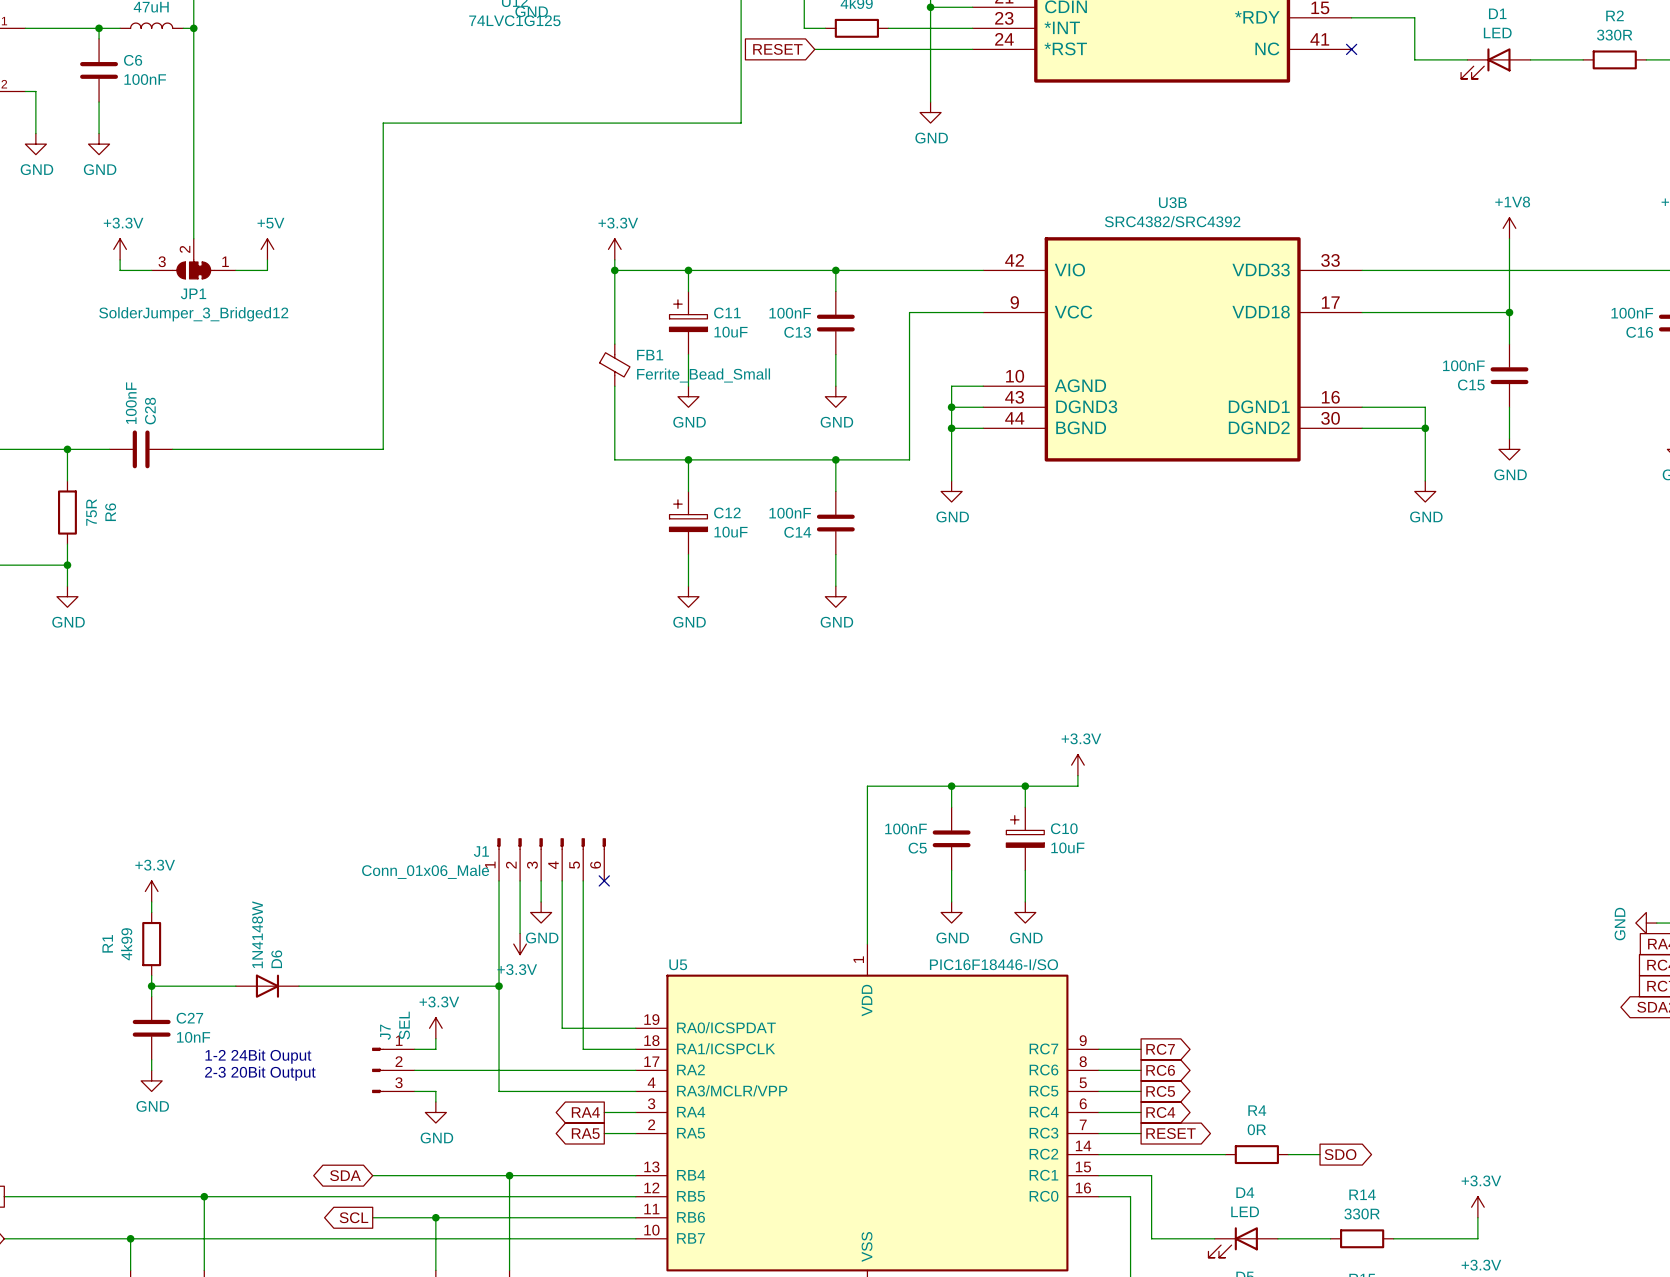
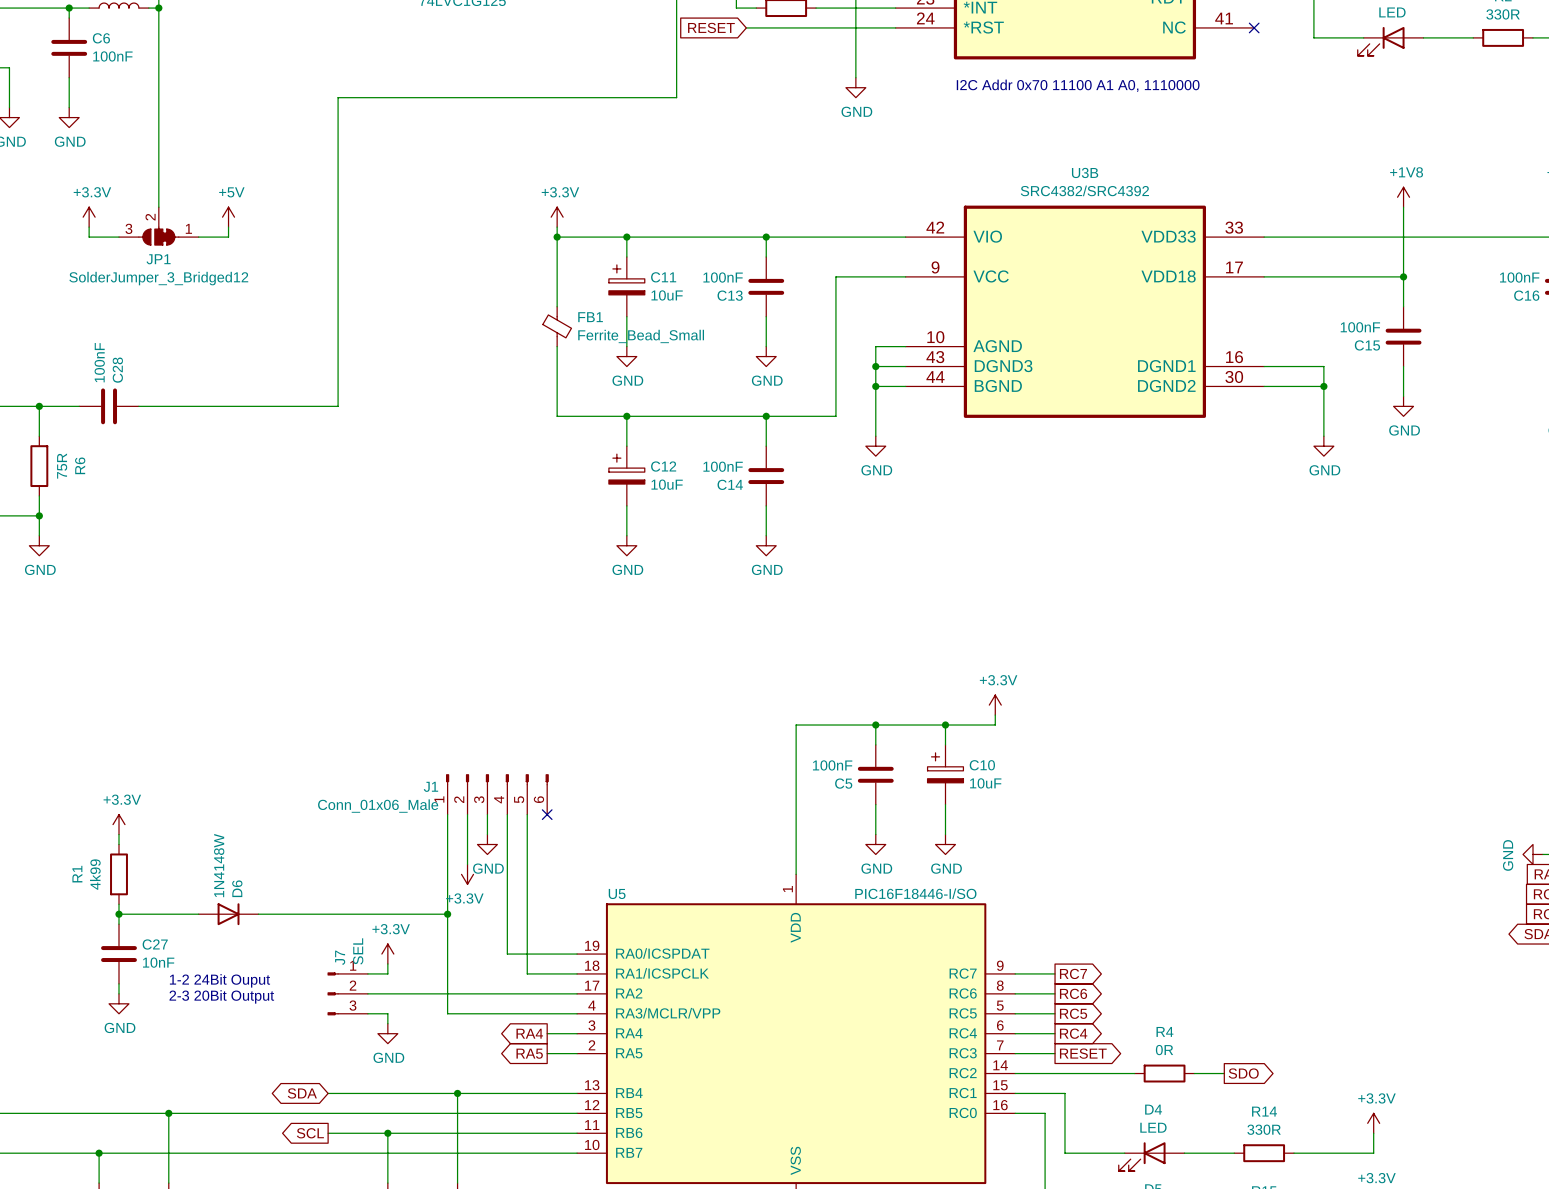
text: none -> I2C Addr 0x70 11100 A1 A0, 1110000 (1078, 85)

